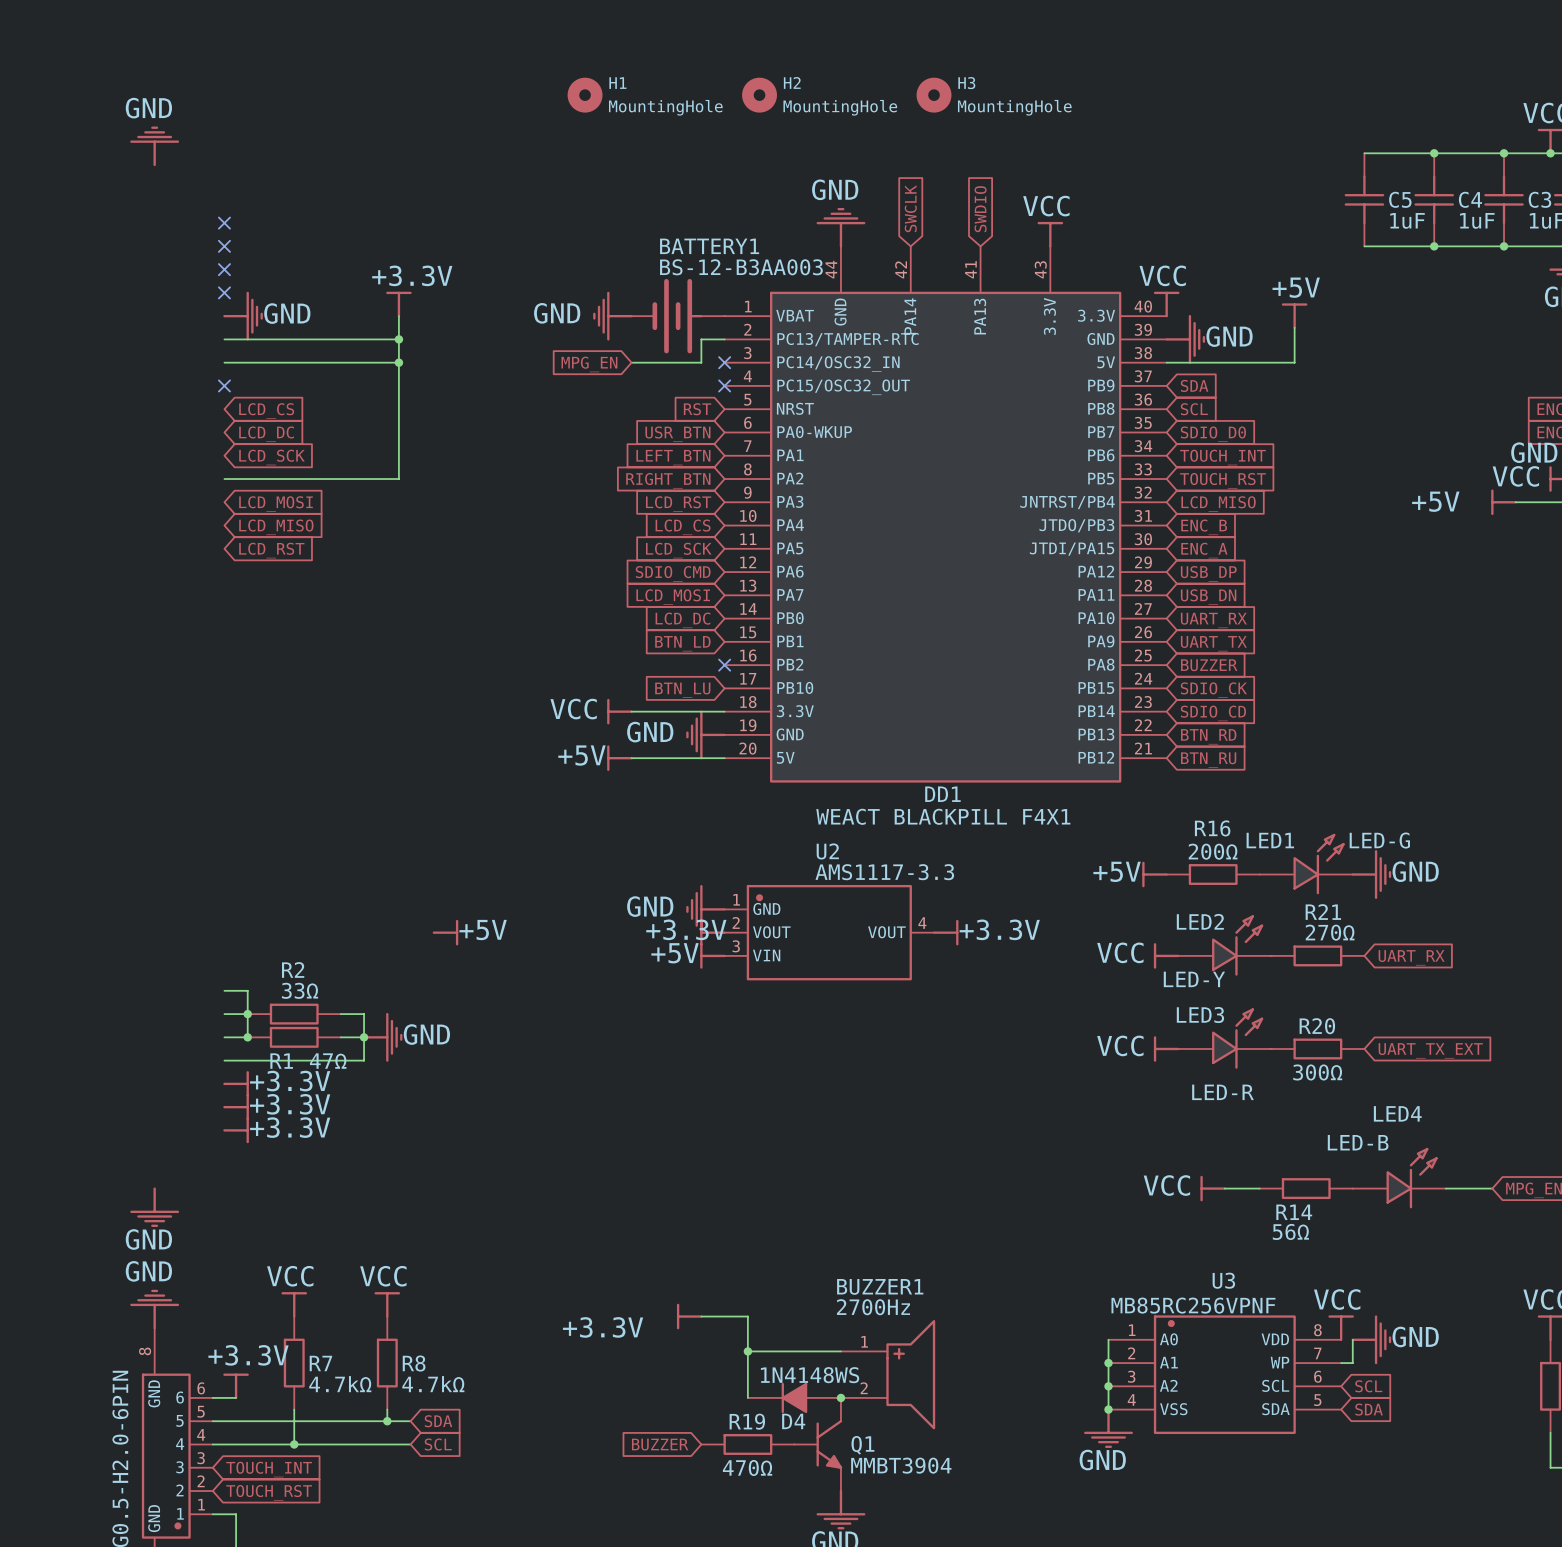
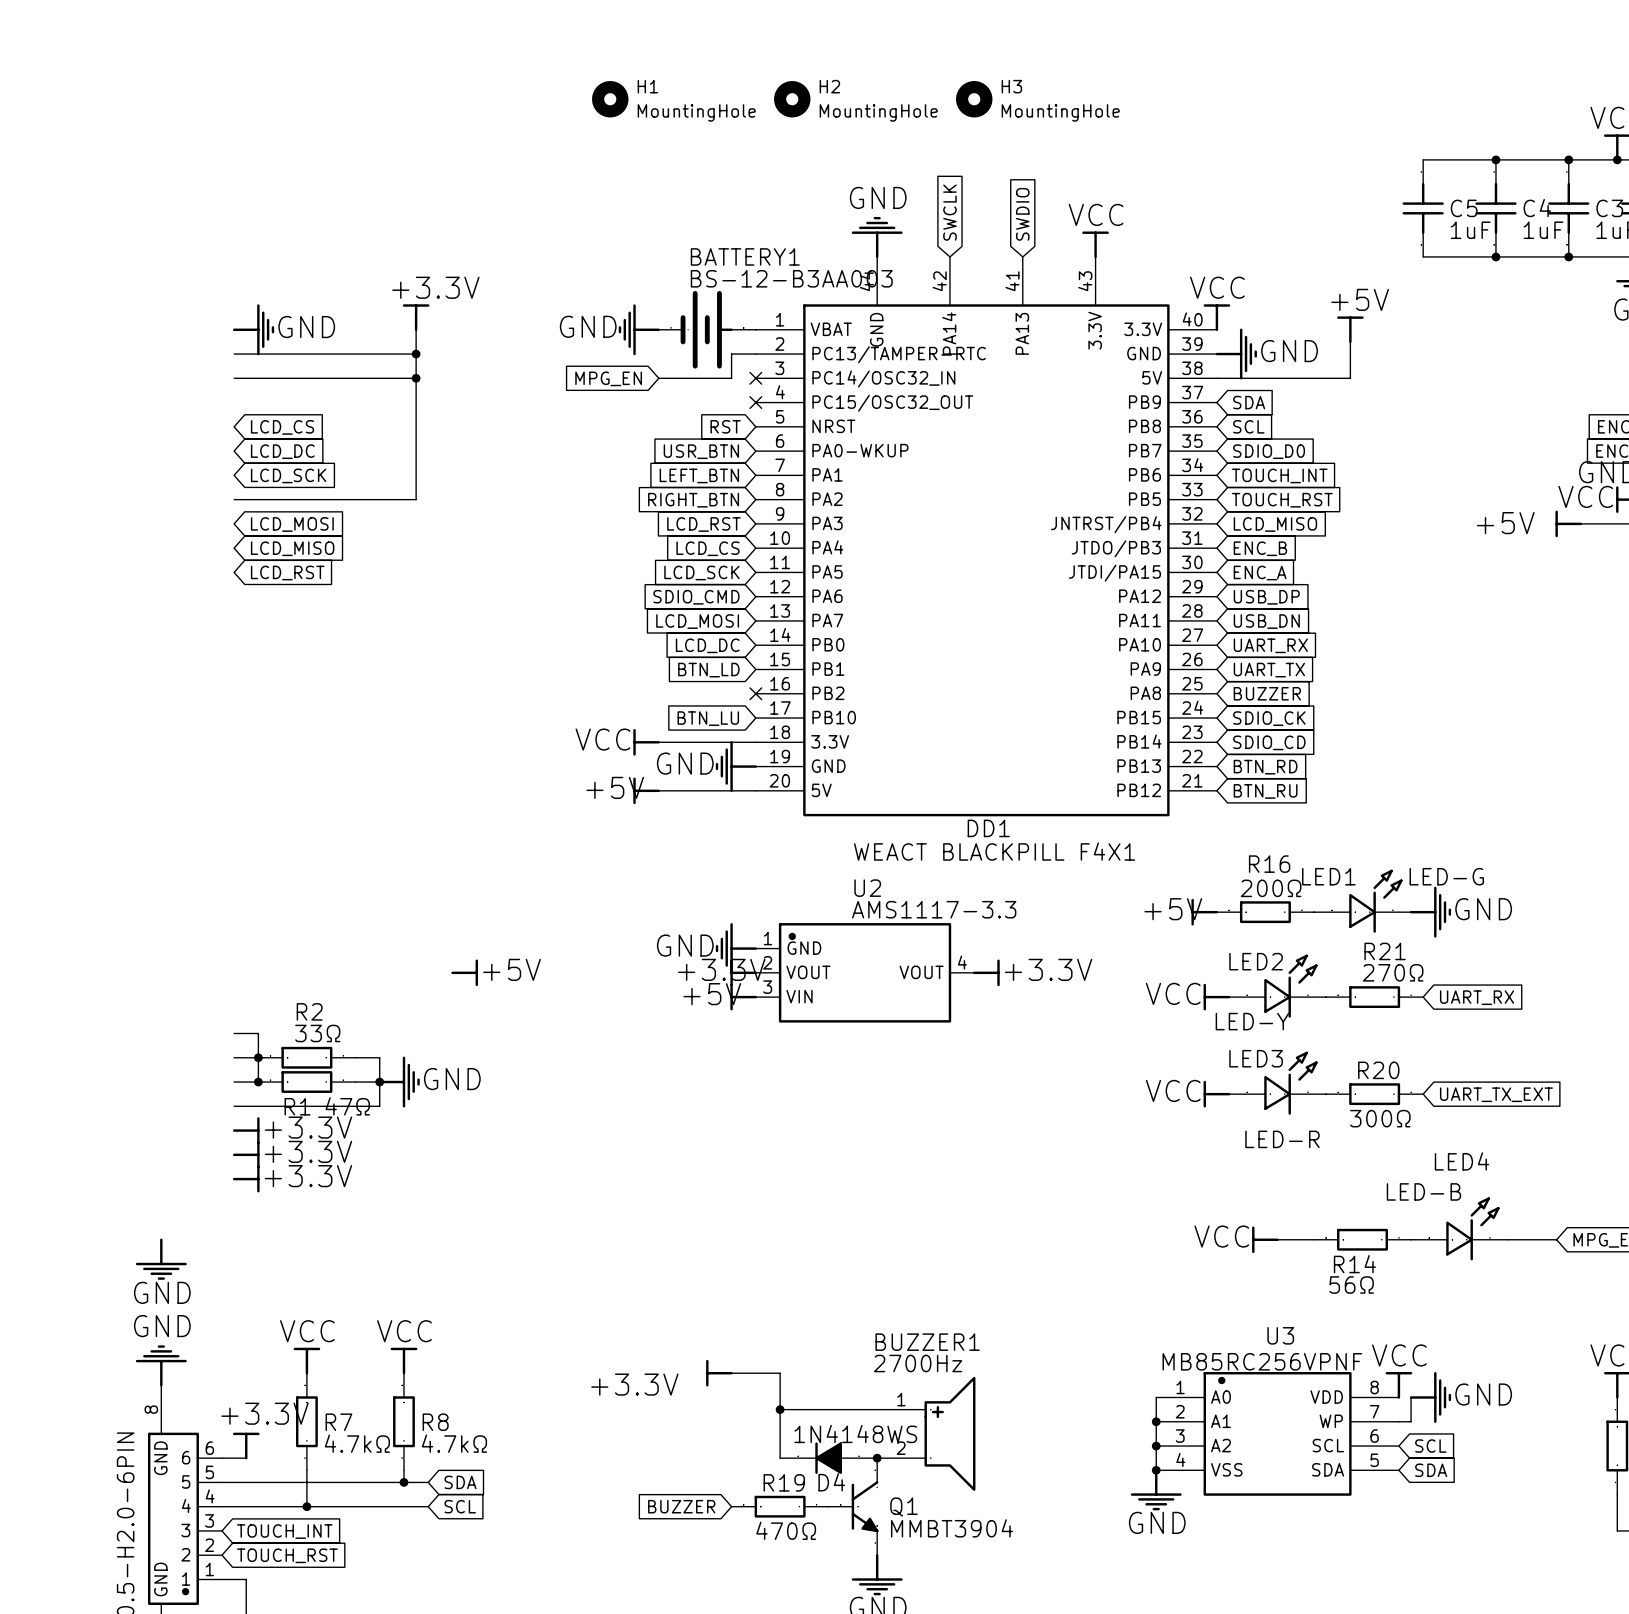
power symbol: GND (154, 146) -> none
no-connect mark: (224, 223) -> none
no-connect mark: (224, 246) -> none
no-connect mark: (224, 269) -> none
no-connect mark: (224, 292) -> none
no-connect mark: (224, 385) -> none

